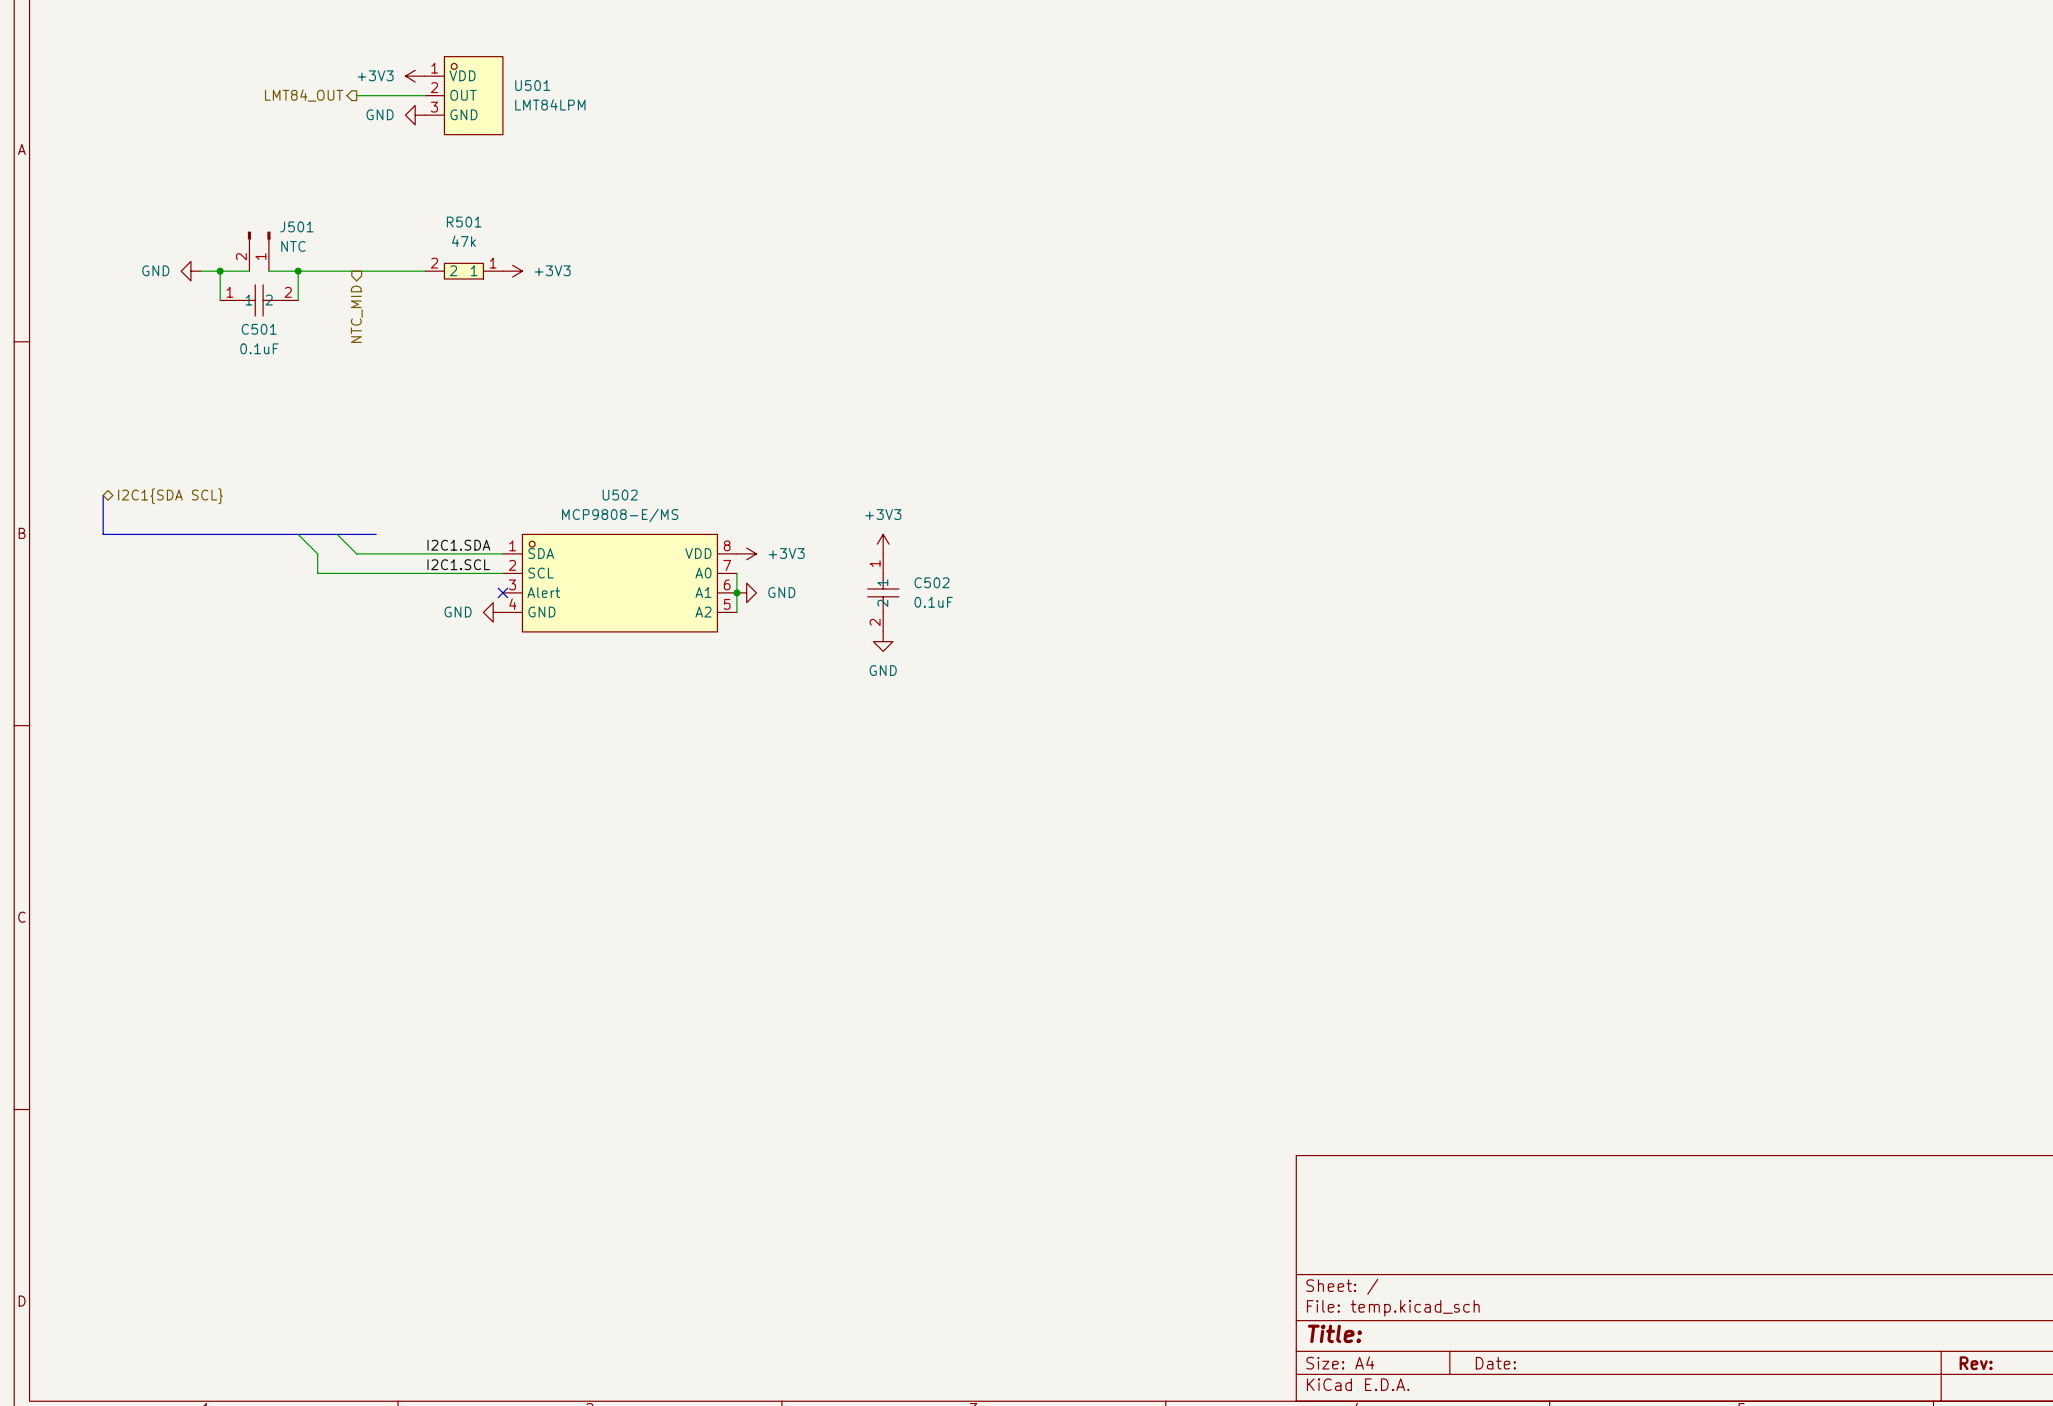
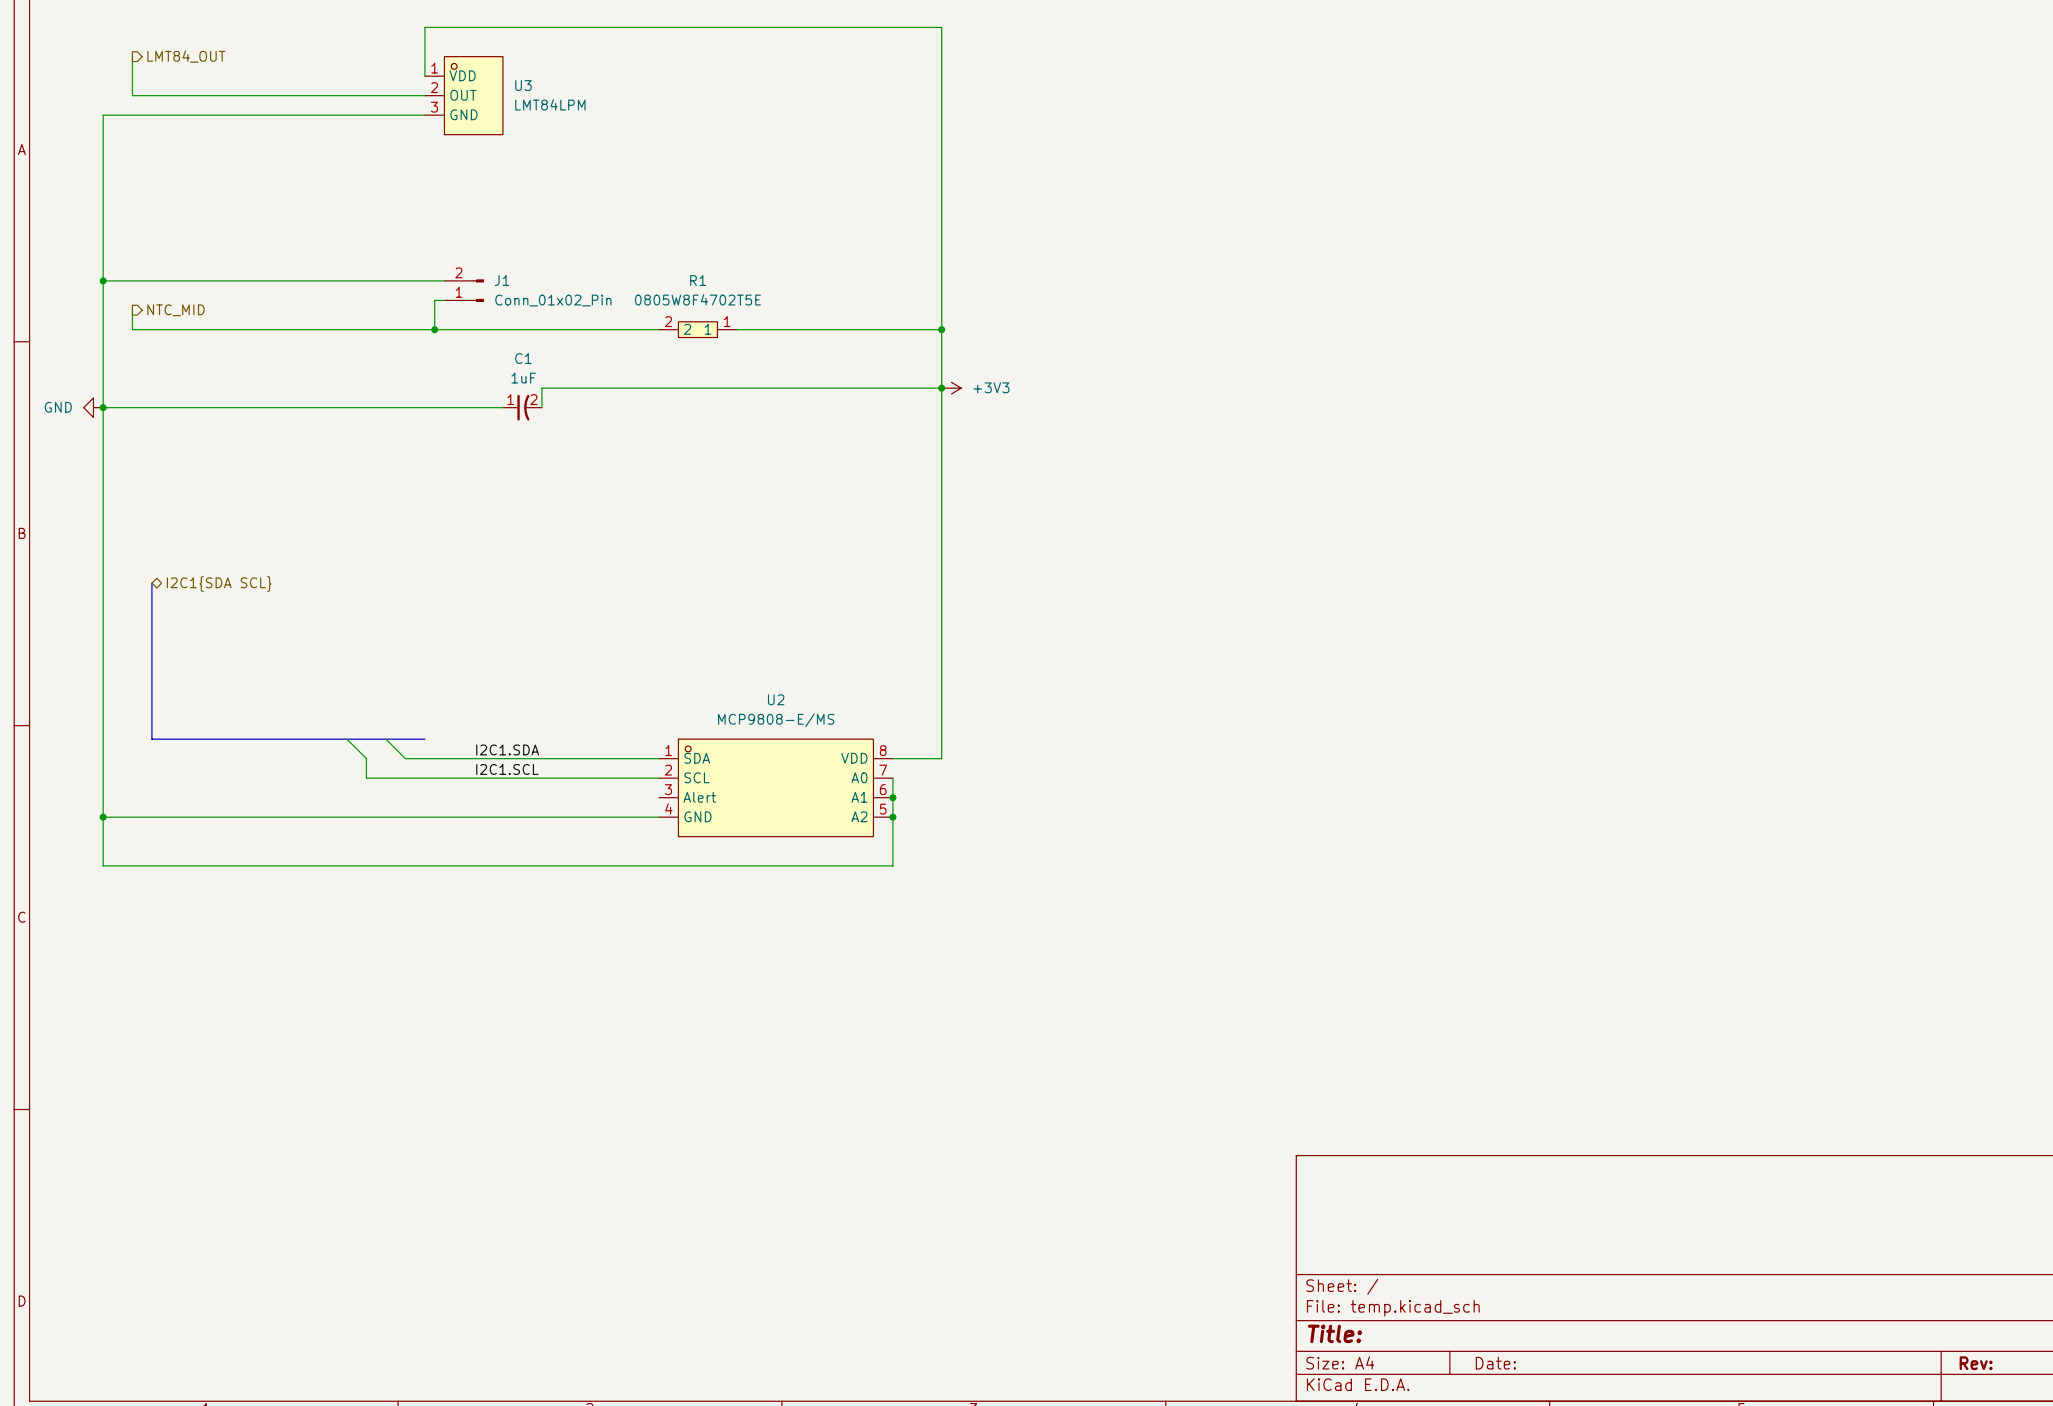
wire: none -> (132, 56) (132, 95) (356, 95)
hierarchical label: none -> LMT84_OUT (186, 56)
power symbol: +3V3 (415, 76) -> none
wire: none -> (424, 76) (424, 27) (941, 27) (941, 758) (892, 758)
U501 name: U501 (532, 85) -> U3 (523, 85)
hierarchical label: LMT84_OUT (304, 95) -> none
power symbol: GND (415, 115) -> none
wire: none -> (424, 115) (103, 115) (103, 865) (892, 865) (892, 778)
J501: NTC (259, 251) -> none
power symbol position: GND (190, 271) -> GND (93, 407)
wire: (200, 271) (249, 271) -> none
wire: (220, 271) (220, 300) -> none
junction: (220, 271) -> none
wire: (268, 271) (424, 271) -> none
wire: (298, 271) (298, 300) -> none
junction: (298, 271) -> none
R501: 47k (463, 271) -> none
power symbol: +3V3 (512, 271) -> none
wire: none -> (103, 280) (444, 280)
junction: none -> (103, 280)
J1: none -> Conn_01x02_Pin (464, 290)
C501: 0.1uF (259, 300) -> none
wire: none -> (444, 300) (434, 300) (434, 329)
wire: none -> (132, 310) (132, 329) (658, 329)
hierarchical label: none -> NTC_MID (175, 310)
hierarchical label: NTC_MID (356, 314) -> none
junction: none -> (434, 329)
R1: none -> 0805W8F4702T5E (697, 329)
wire: none -> (736, 329) (941, 329)
junction: none -> (941, 329)
wire: none -> (941, 388) (541, 388) (541, 407)
junction: none -> (941, 388)
power symbol: none -> +3V3 (951, 388)
wire: none -> (103, 407) (502, 407)
junction: none -> (103, 407)
C1: none -> 1uF (522, 407)
bus: (103, 495) (103, 534) (376, 534) -> none
hierarchical label position: I2C1{SDA SCL} (170, 496) -> I2C1{SDA SCL} (219, 583)
wire: (298, 534) (317, 553) (317, 573) (502, 573) -> none
wire: (337, 534) (356, 553) (502, 553) -> none
power symbol: +3V3 (883, 544) -> none
label: I2C1.SDA (458, 545) -> none
power symbol: +3V3 (746, 553) -> none
label: I2C1.SCL (458, 564) -> none
wire: (736, 573) (736, 612) -> none
bus: none -> (151, 583) (151, 739) (424, 739)
U502: MCP9808-E/MS (619, 583) -> none
no-connect mark: (502, 592) -> none
junction: (736, 592) -> none
power symbol: GND (746, 592) -> none
C502: 0.1uF (883, 592) -> none
power symbol: GND (493, 612) -> none
power symbol: GND (883, 641) -> none
wire: none -> (346, 739) (366, 758) (366, 778) (658, 778)
wire: none -> (385, 739) (405, 758) (658, 758)
label: none -> I2C1.SDA (507, 749)
label: none -> I2C1.SCL (507, 769)
U2: none -> MCP9808-E/MS (775, 787)
junction: none -> (892, 797)
wire: none -> (103, 817) (658, 817)
junction: none -> (103, 817)
junction: none -> (892, 817)

